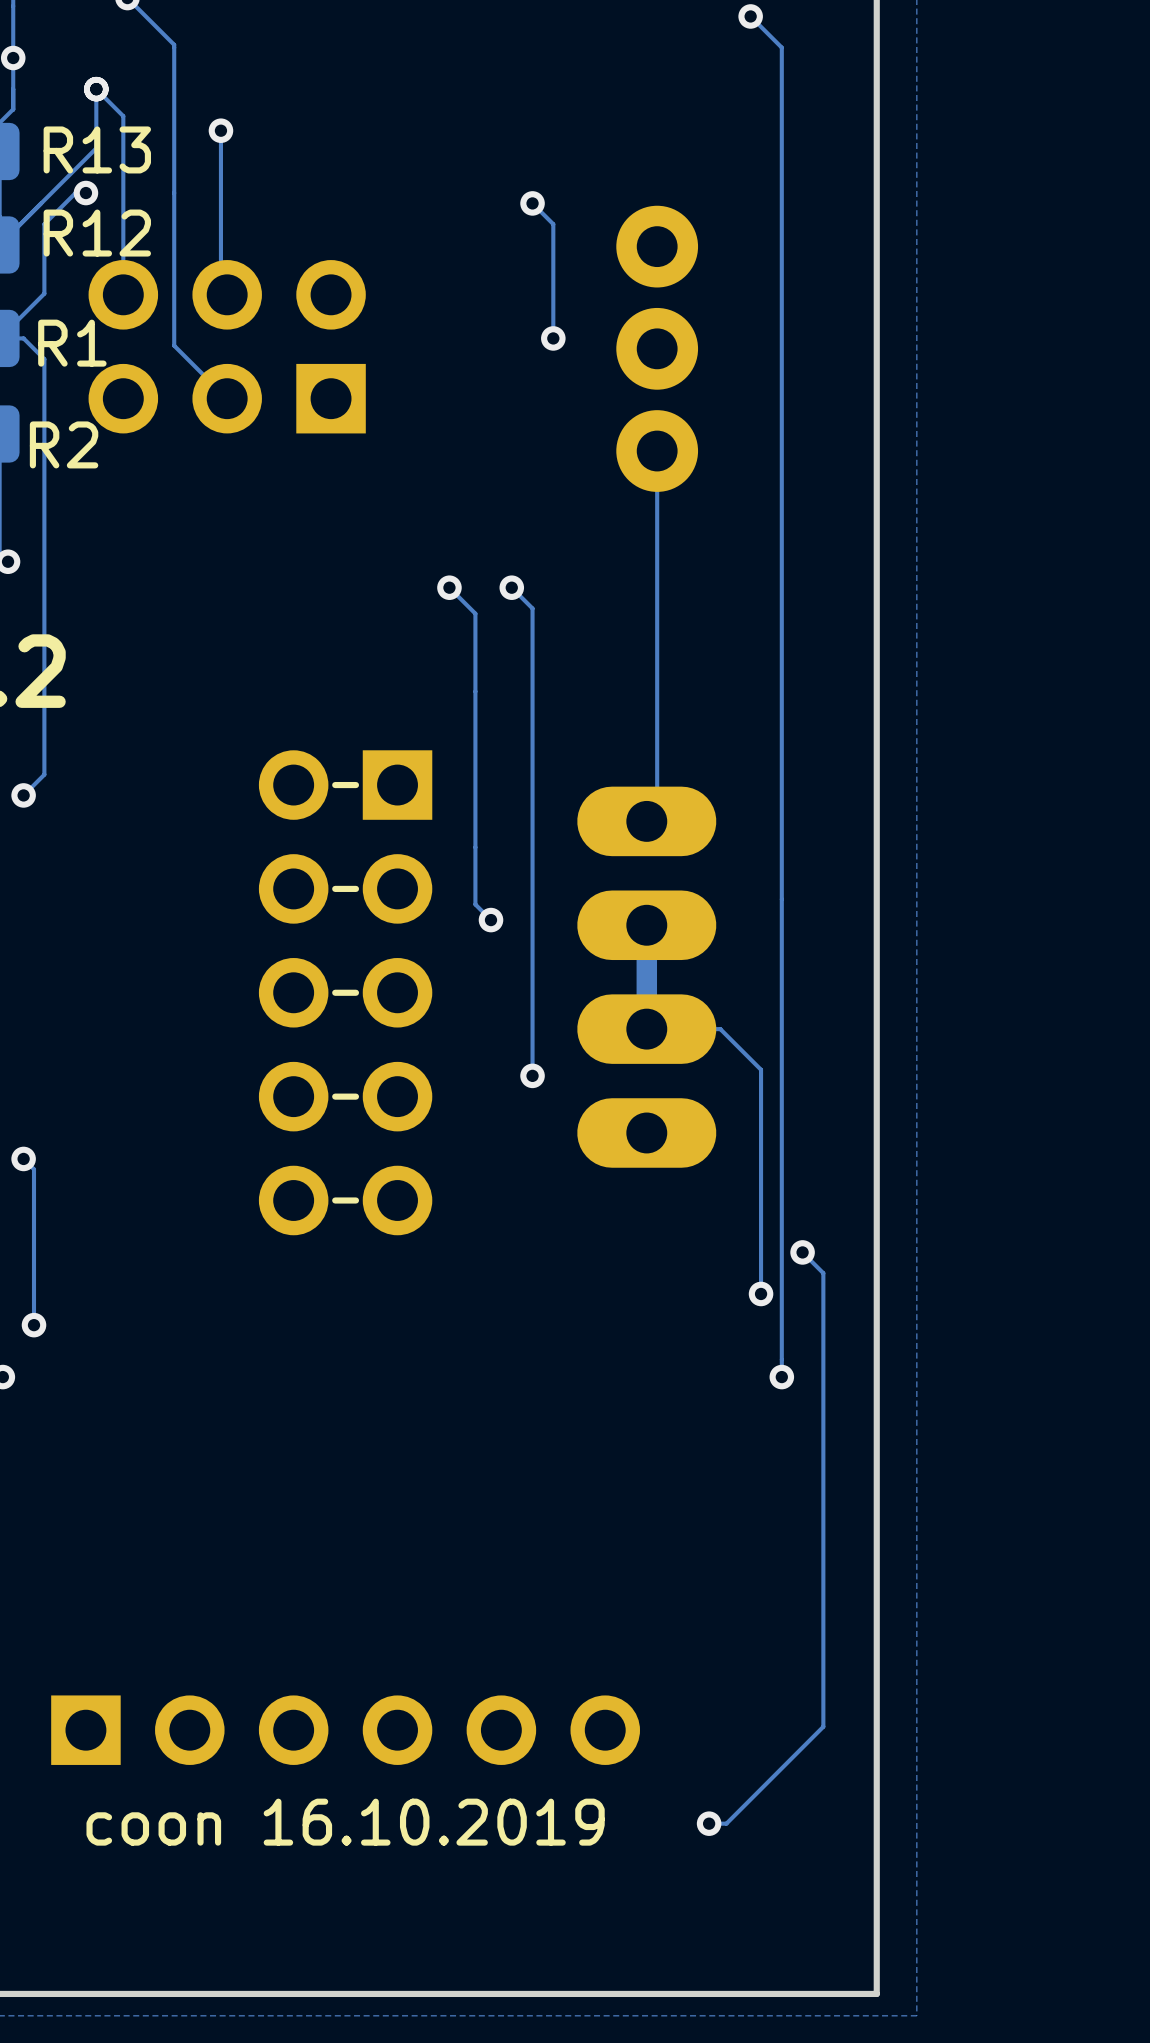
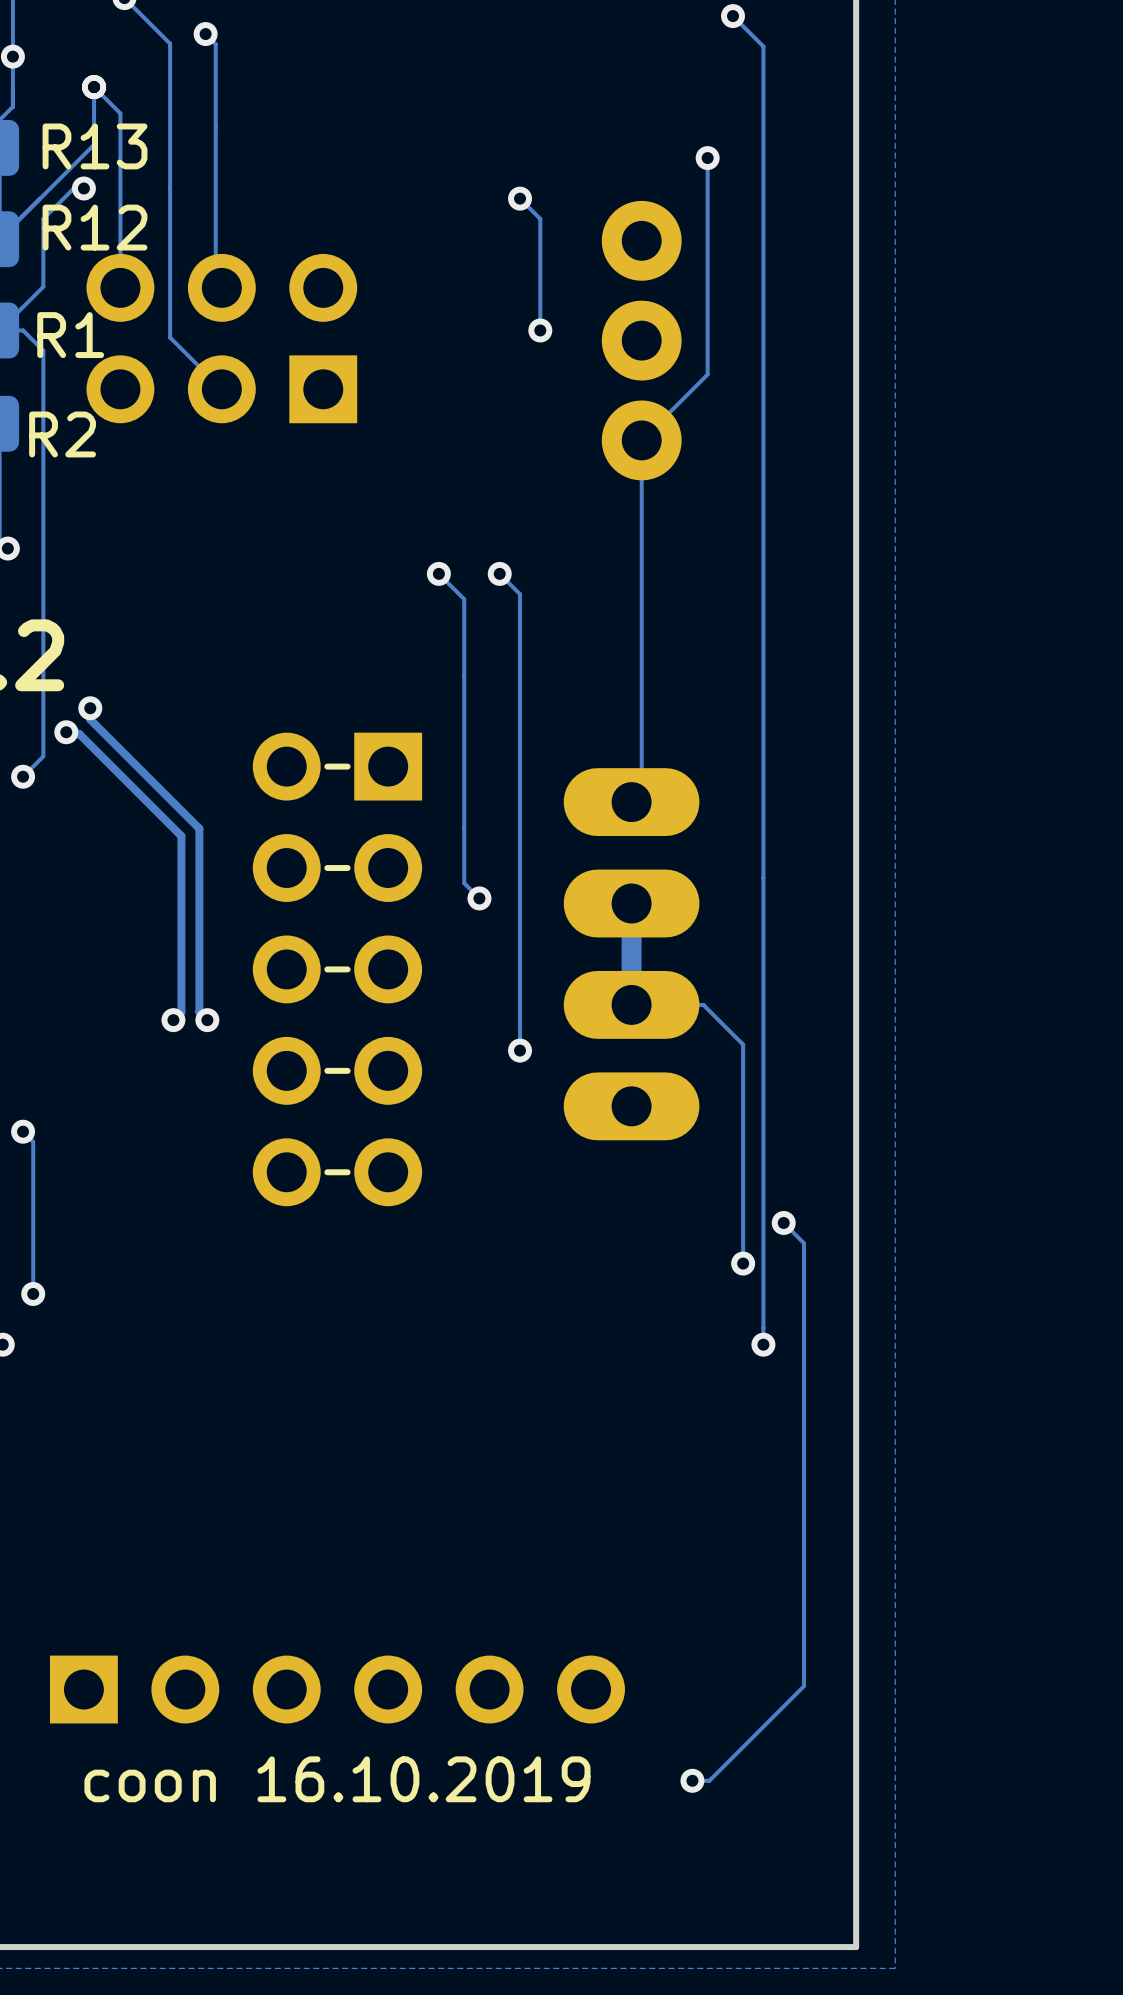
track: none -> (205, 34) (215, 44) (215, 127)
via position: (220, 130) -> (205, 34)
track: none -> (707, 158) (707, 374) (641, 440)
via: none -> (707, 158)
track: none -> (90, 708) (90, 719) (199, 828) (199, 1012) (207, 1020)
via: none -> (90, 708)
track: none -> (66, 732) (79, 734) (181, 836) (181, 1012) (173, 1020)
via: none -> (66, 732)
via: none -> (173, 1020)
via: none -> (207, 1020)

